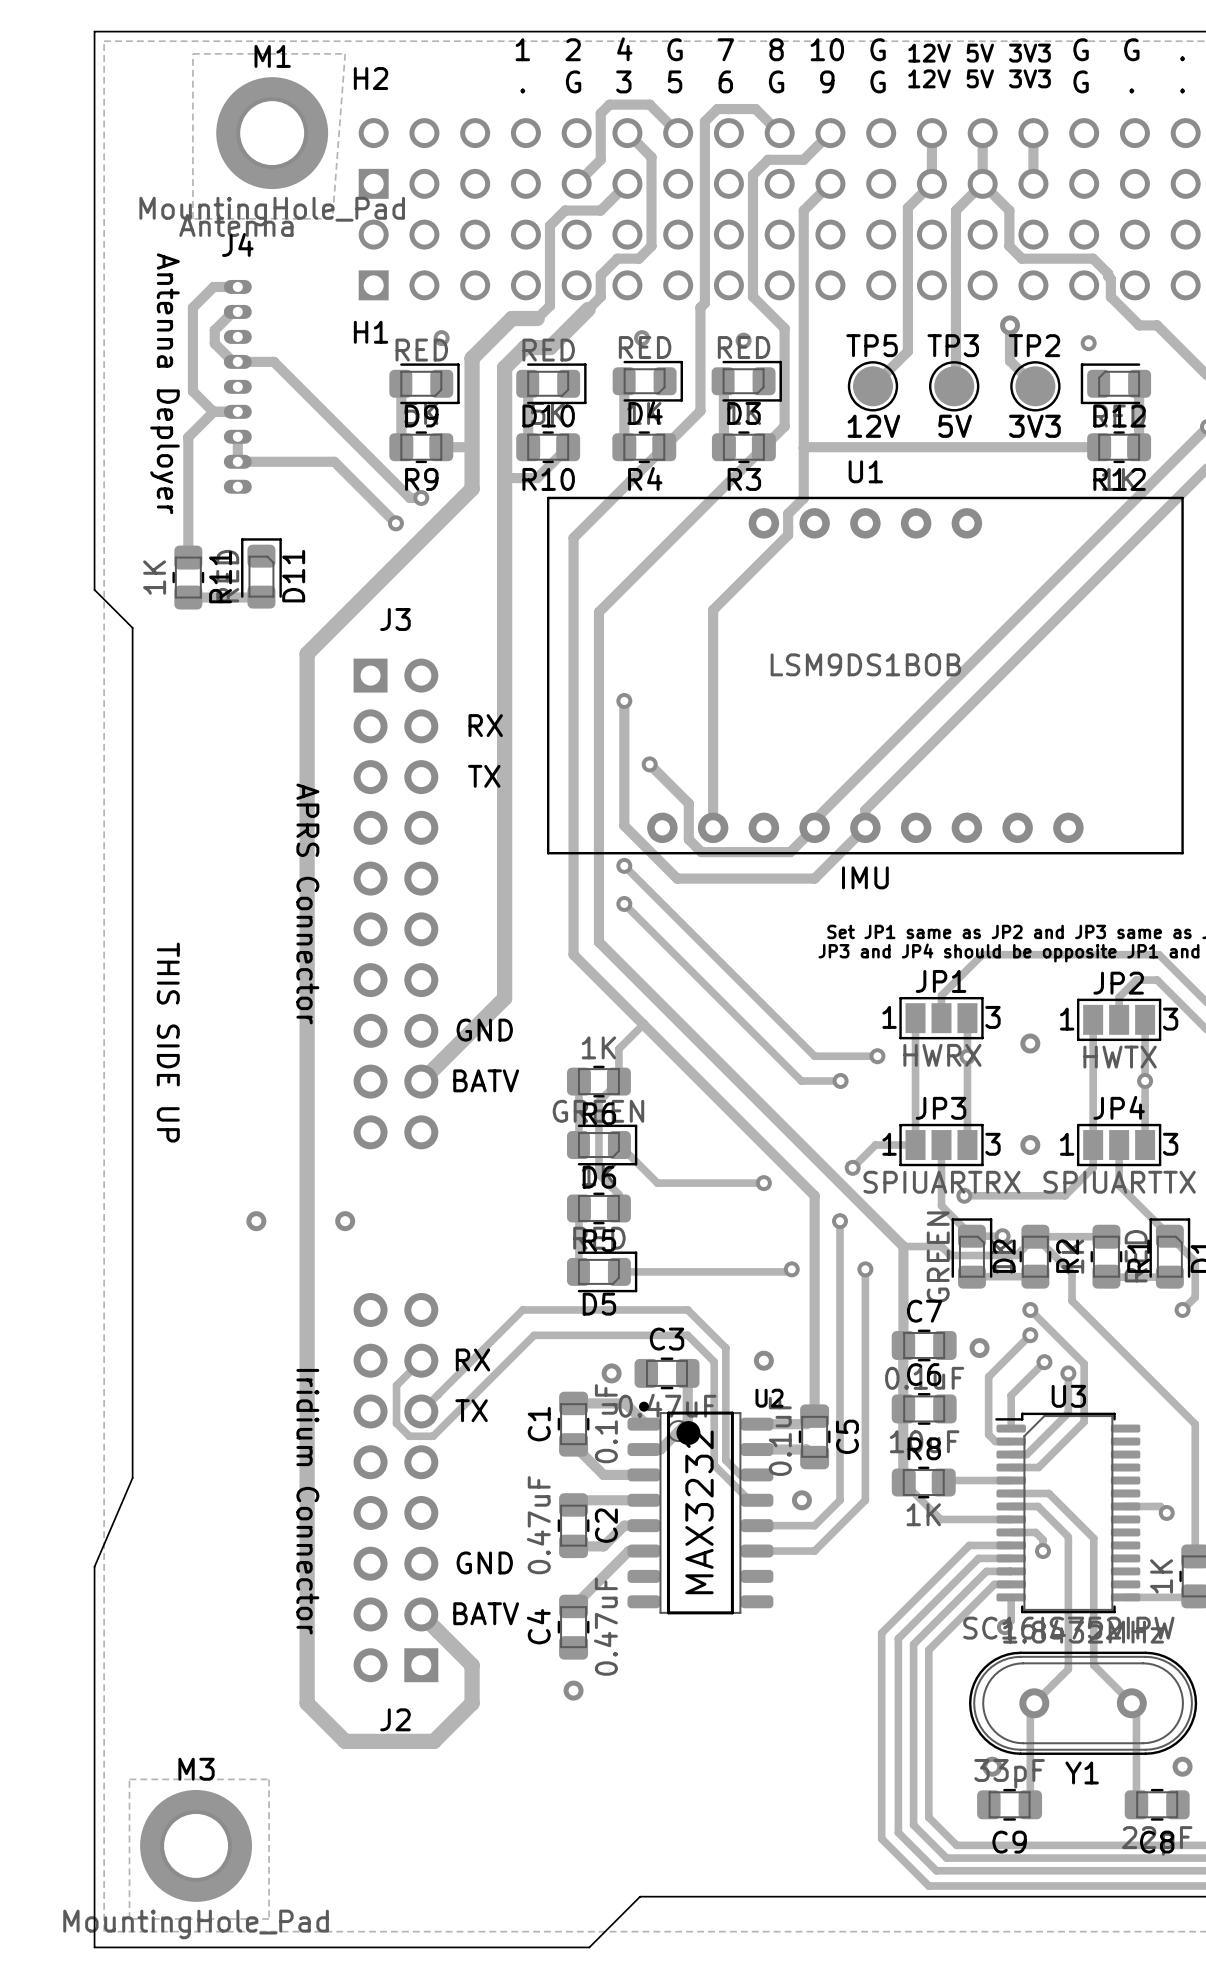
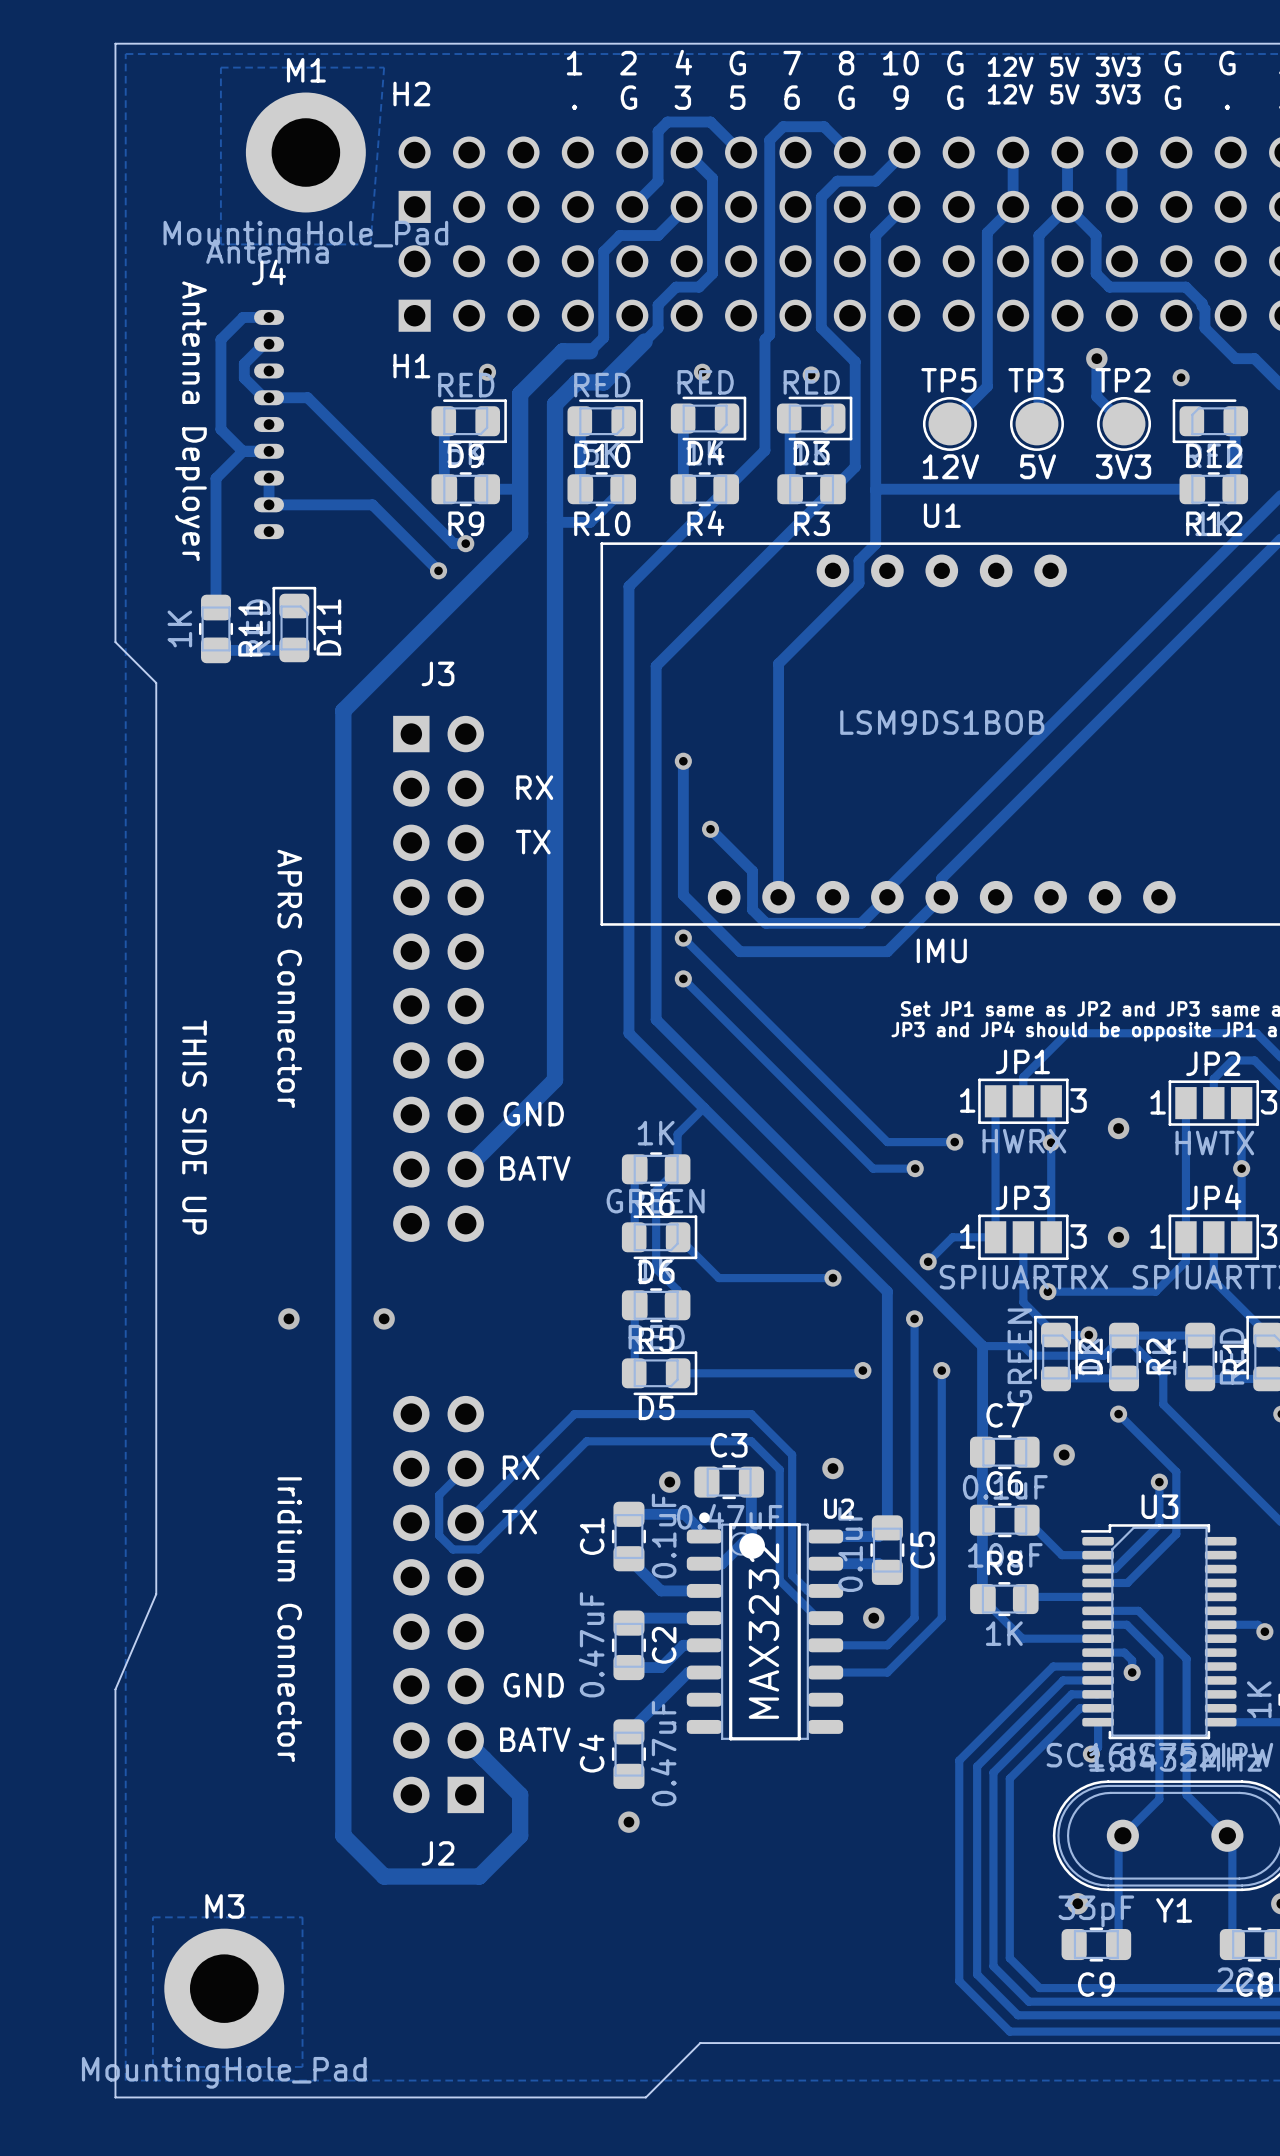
text position: APRS Connector (307, 903) -> APRS Connector (289, 978)
track: (1030, 1335) (988, 1376) (988, 1434) (995, 1441) -> (1027, 1520) (1061, 1555) (1081, 1555)
via: (1030, 1335) -> none
track: (1044, 1362) (1011, 1395) (1011, 1428) -> none
via: (1044, 1362) -> none
text position: Iridium Connector (307, 1501) -> Iridium Connector (289, 1619)

